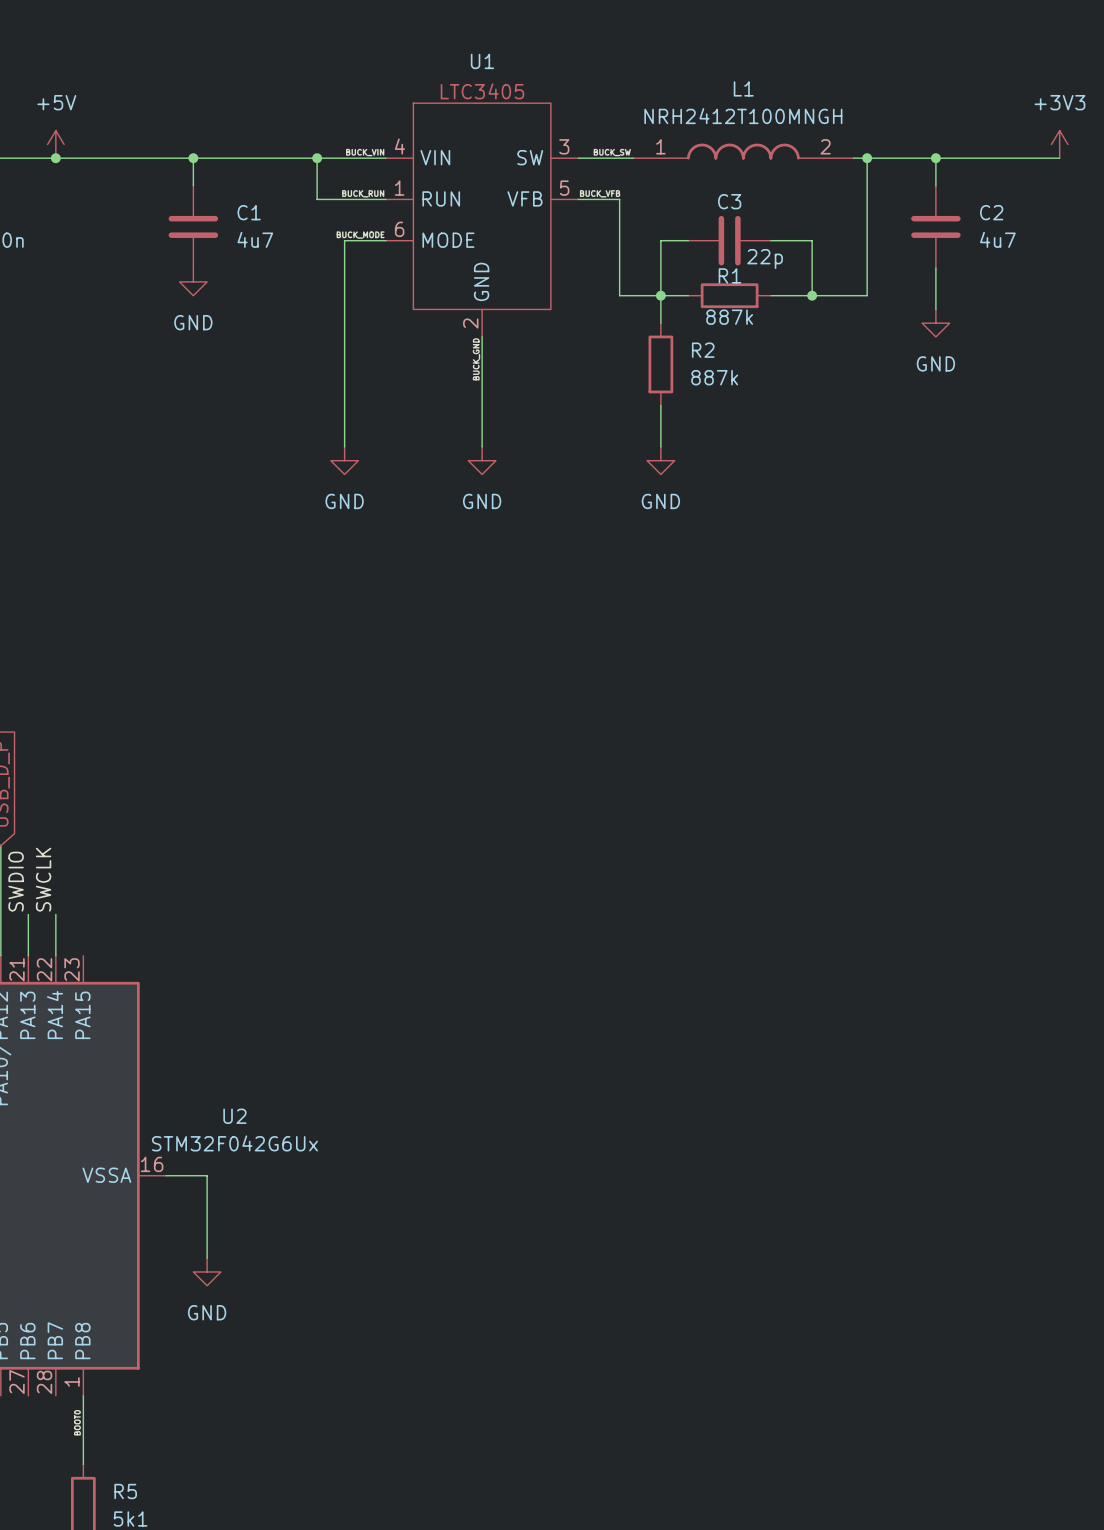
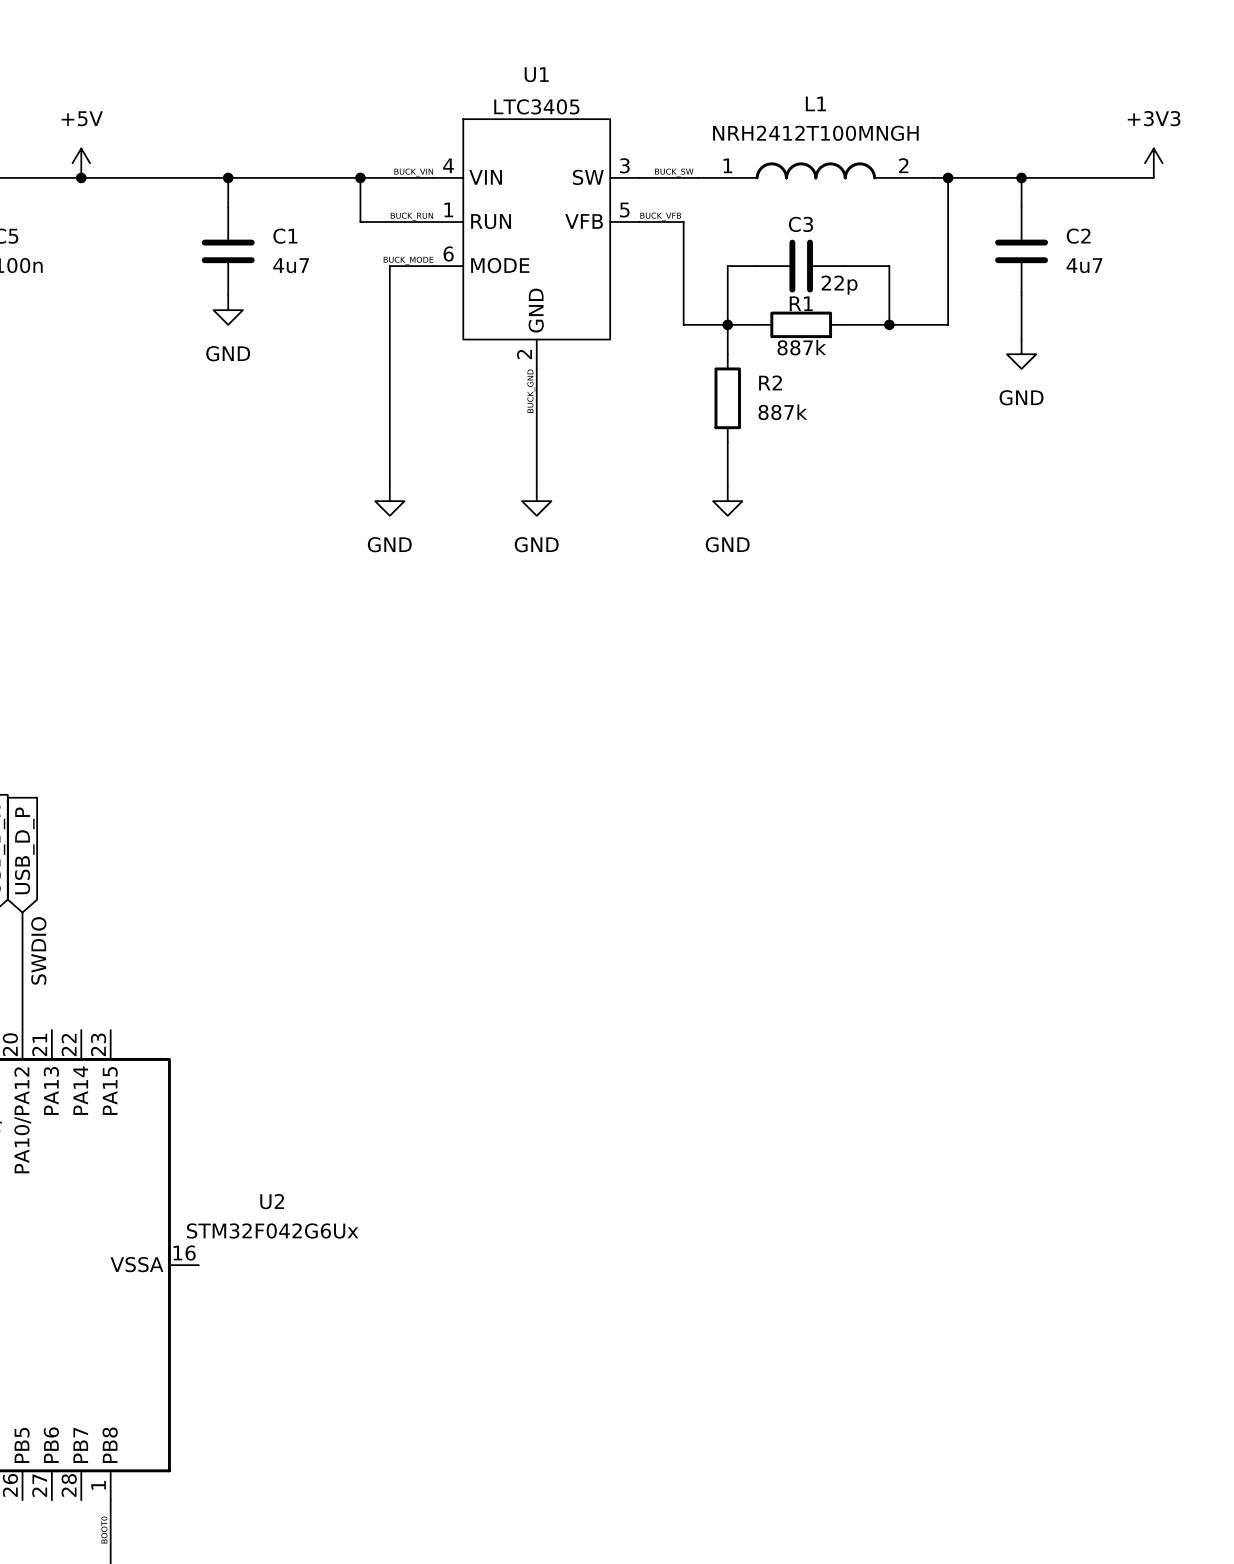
label: SWCLK (43, 879) -> none
wire: (28, 914) (28, 955) -> none
wire: (55, 914) (55, 955) -> none
wire: (165, 1175) (207, 1175) (207, 1258) -> none
power symbol: GND (207, 1271) -> none

